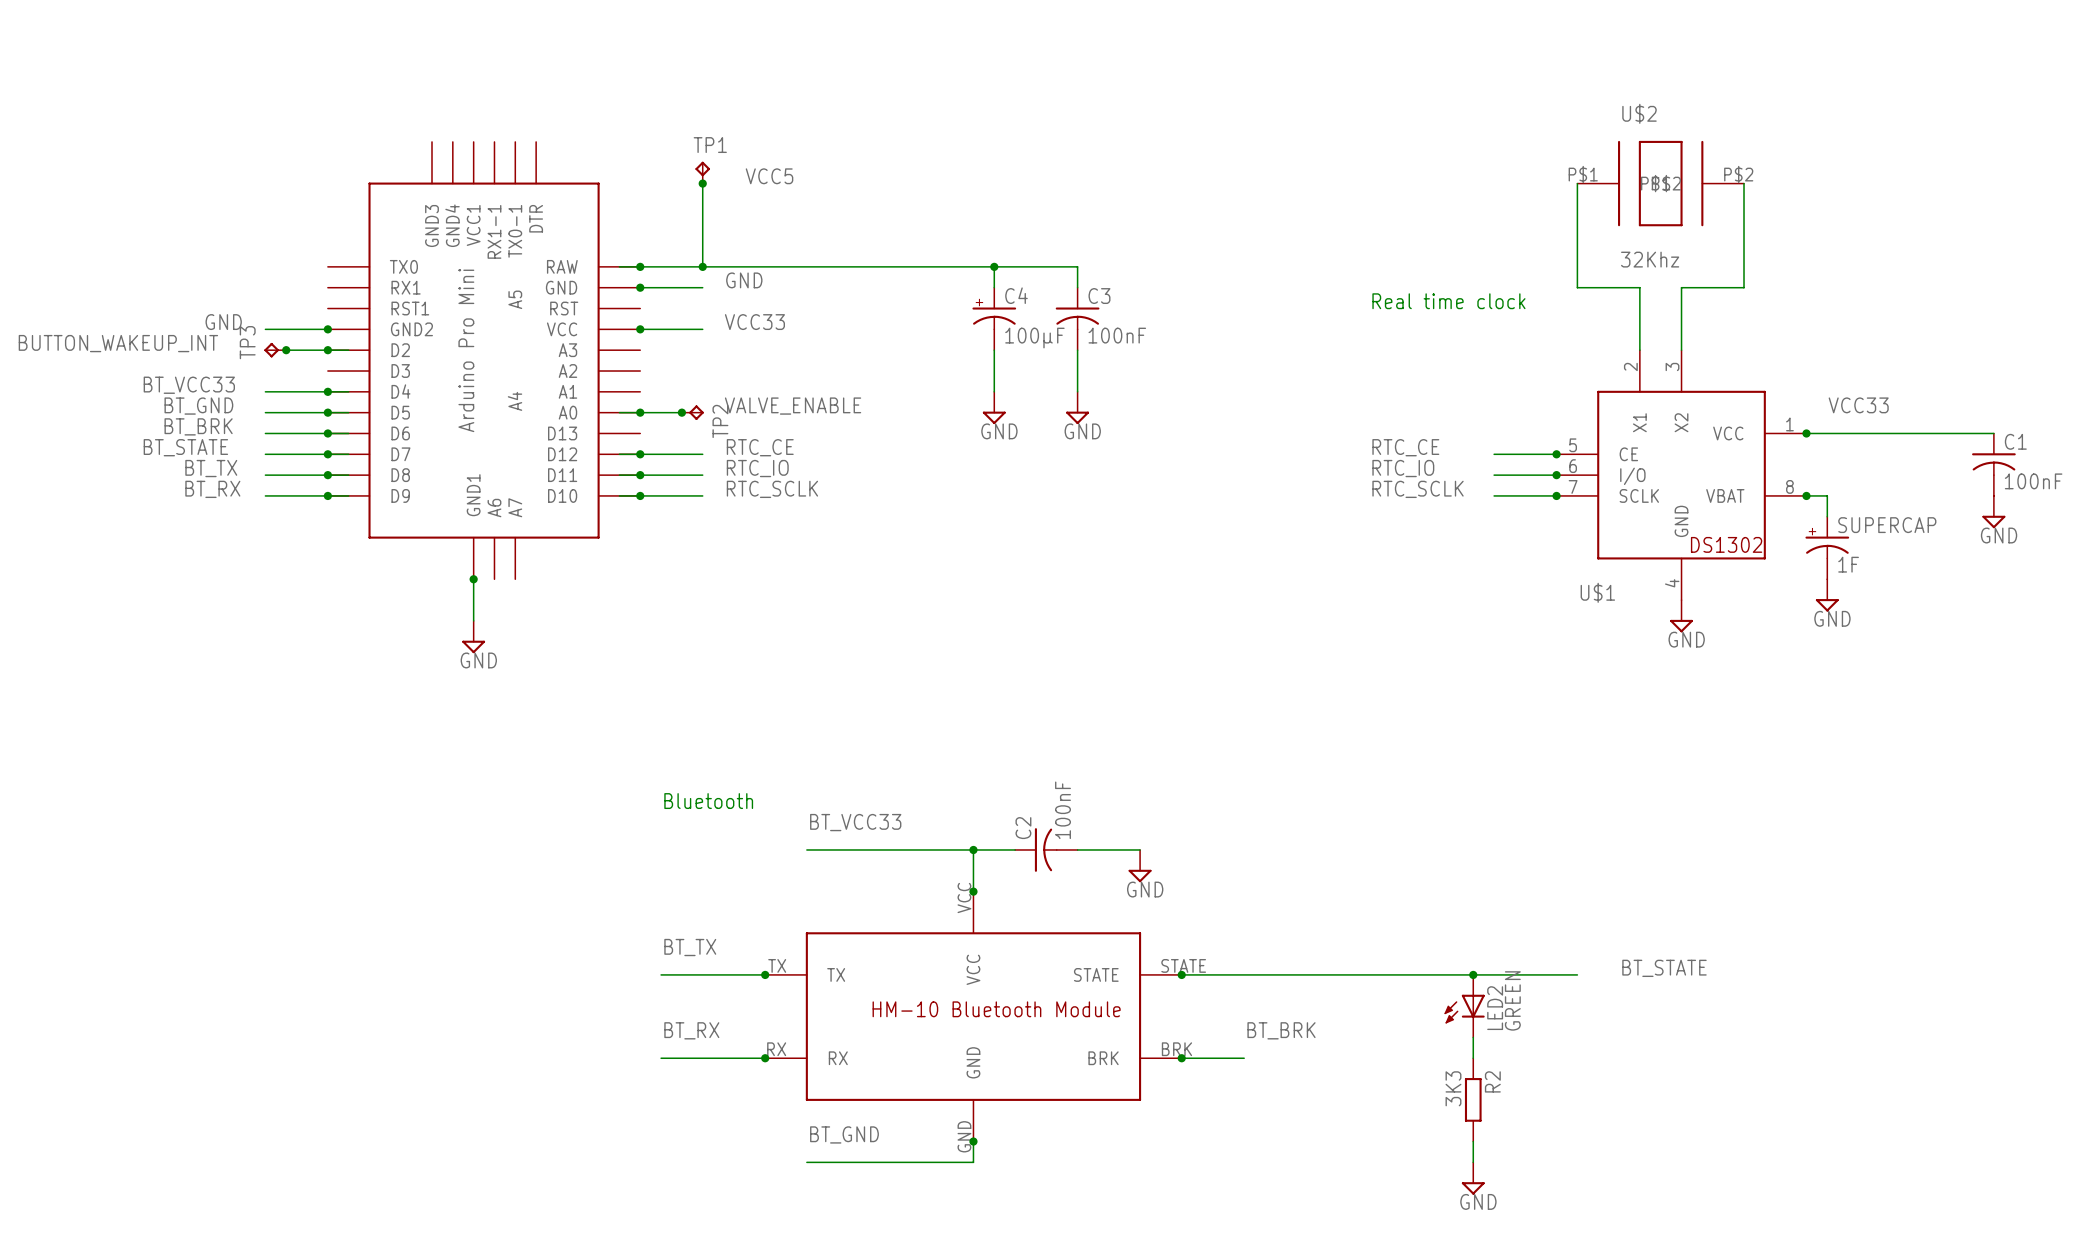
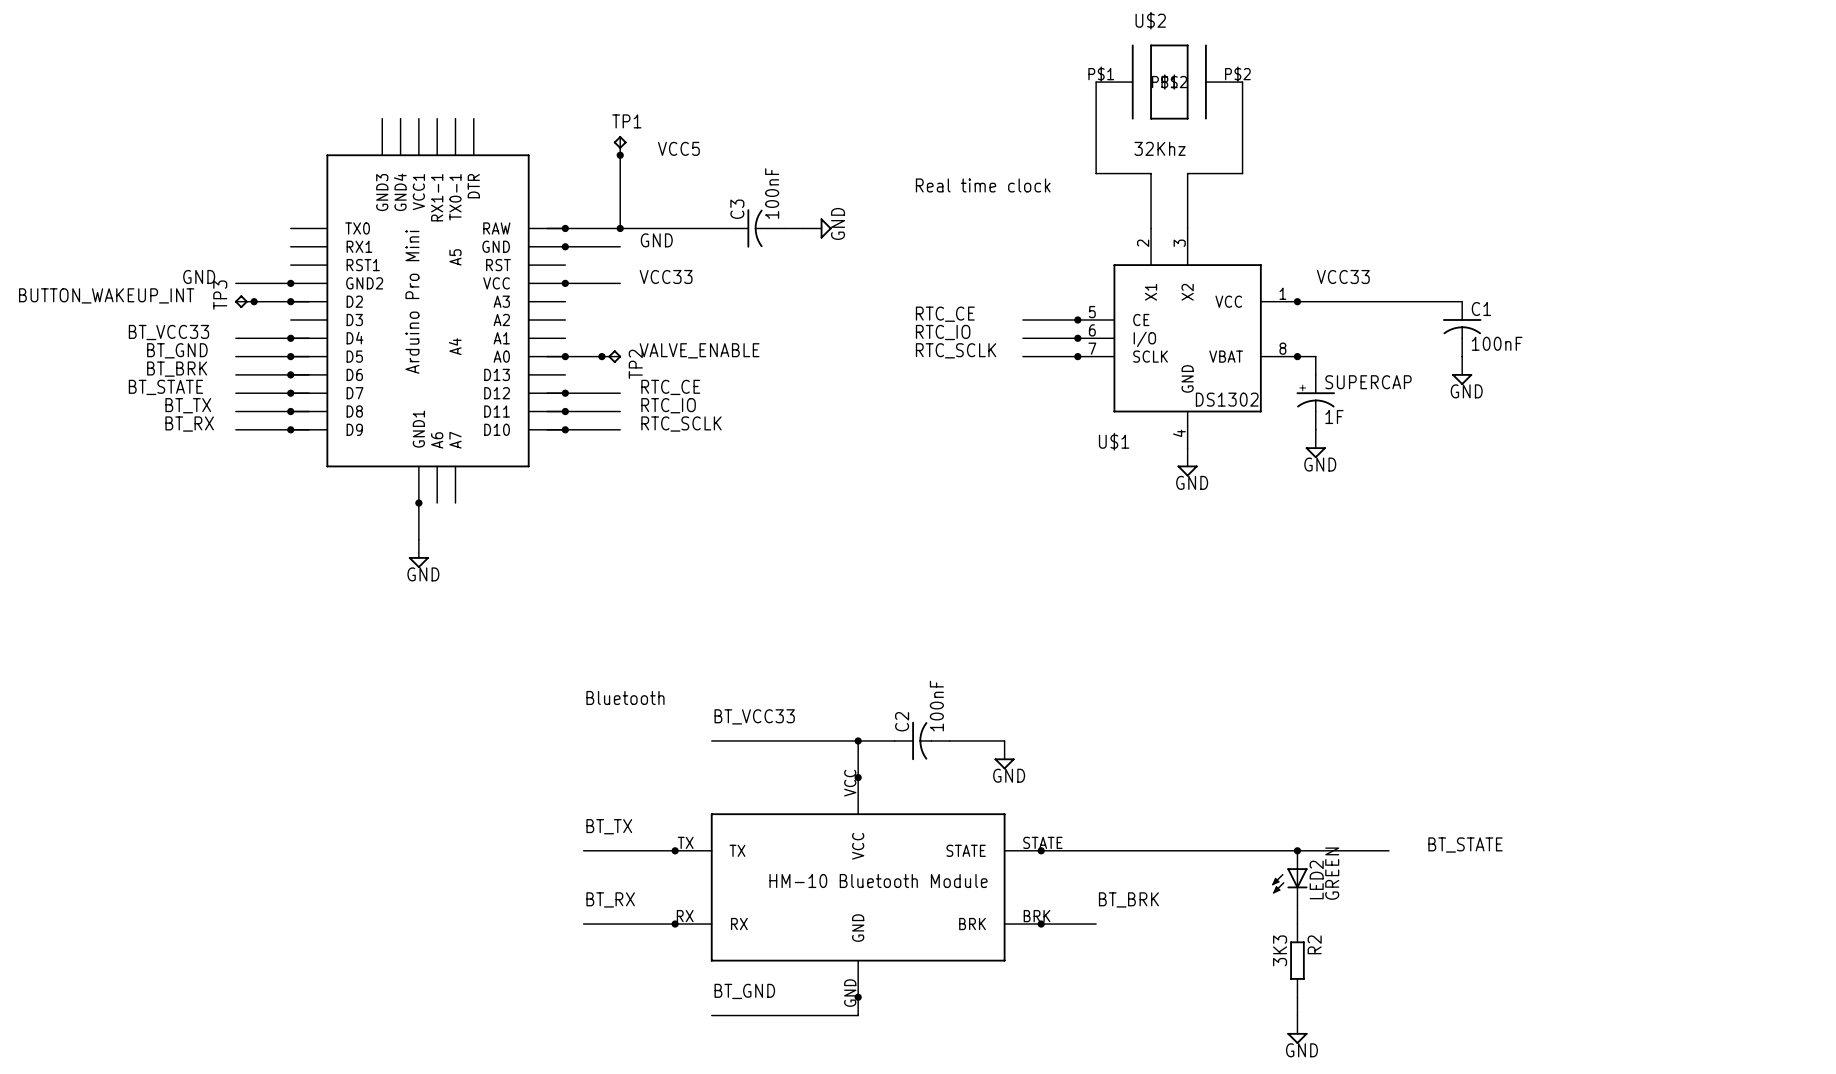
wire: none -> (1096, 82) (1096, 173) (1151, 173) (1151, 228)
wire: none -> (1242, 82) (1242, 173) (1187, 173) (1187, 228)
wire: (1577, 183) (1577, 287) (1639, 287) (1639, 350) -> none
U$2 position: (1660, 183) -> (1169, 82)
wire: (1744, 183) (1744, 287) (1681, 287) (1681, 350) -> none
text: none -> Real time clock (983, 185)
wire: (910, 266) (1077, 266) (1077, 287) -> none
power symbol: none -> GND (817, 228)
wire: (994, 266) (994, 287) -> none
junction: (994, 266) -> none
text: Real time clock (1448, 301) -> none
C4: 100µF (994, 318) -> none
C3 rotation: 0° (1077, 318) -> 90° counterclockwise (757, 228)
C3 position: (1077, 318) -> (757, 228)
label: none -> VCC33 (1343, 276)
wire: (994, 350) (994, 391) -> none
wire: (1077, 350) (1077, 391) -> none
wire: none -> (1297, 301) (1462, 301)
junction: none -> (1297, 301)
label: none -> RTC_CE (945, 314)
wire: none -> (1022, 319) (1077, 319)
junction: none -> (1077, 319)
label: none -> RTC_IO (943, 332)
wire: none -> (1022, 338) (1077, 338)
junction: none -> (1077, 338)
label: VCC33 (1858, 405) -> none
label: none -> RTC_SCLK (956, 350)
power symbol: GND (994, 407) -> none
power symbol: GND (1077, 407) -> none
wire: none -> (1022, 356) (1077, 356)
junction: none -> (1077, 356)
wire: none -> (1297, 356) (1315, 356) (1315, 374)
junction: none -> (1297, 356)
power symbol: none -> GND (1462, 370)
wire: (1806, 433) (1993, 433) -> none
junction: (1806, 433) -> none
label: RTC_CE (1405, 447) -> none
wire: (1494, 454) (1556, 454) -> none
junction: (1556, 454) -> none
SUPERCAP: none -> 1F (1315, 402)
C1 position: (1993, 464) -> (1462, 329)
label: RTC_IO (1403, 468) -> none
wire: (1494, 475) (1556, 475) -> none
junction: (1556, 475) -> none
U$1 position: (1681, 475) -> (1187, 338)
label: RTC_SCLK (1418, 489) -> none
wire: (1494, 495) (1556, 495) -> none
junction: (1556, 495) -> none
wire: (1806, 495) (1827, 495) (1827, 516) -> none
junction: (1806, 495) -> none
power symbol: none -> GND (1315, 444)
power symbol: GND (1993, 512) -> none
power symbol: none -> GND (1187, 462)
SUPERCAP: 1F (1827, 548) -> none
power symbol: GND (1827, 595) -> none
power symbol: GND (1681, 616) -> none

